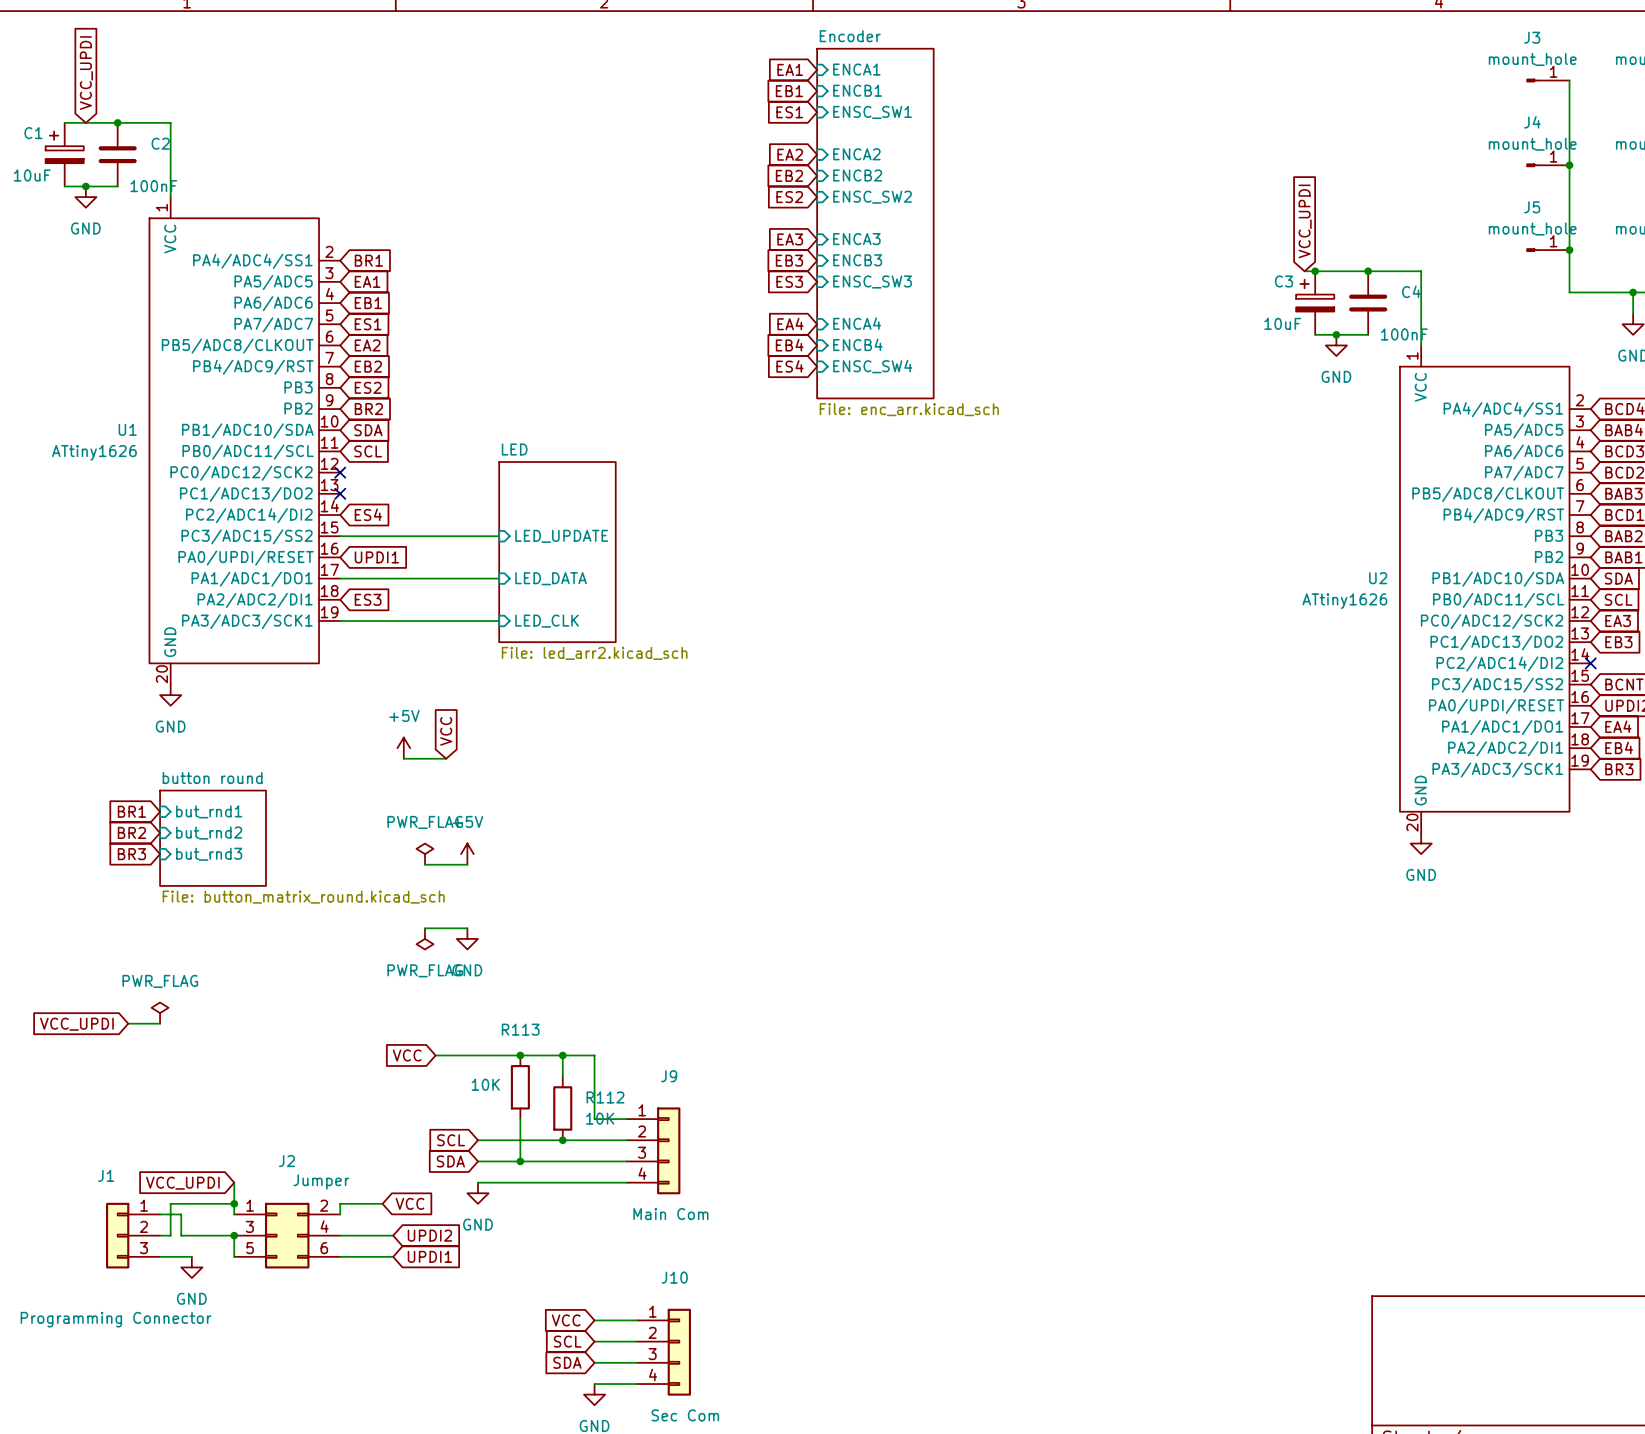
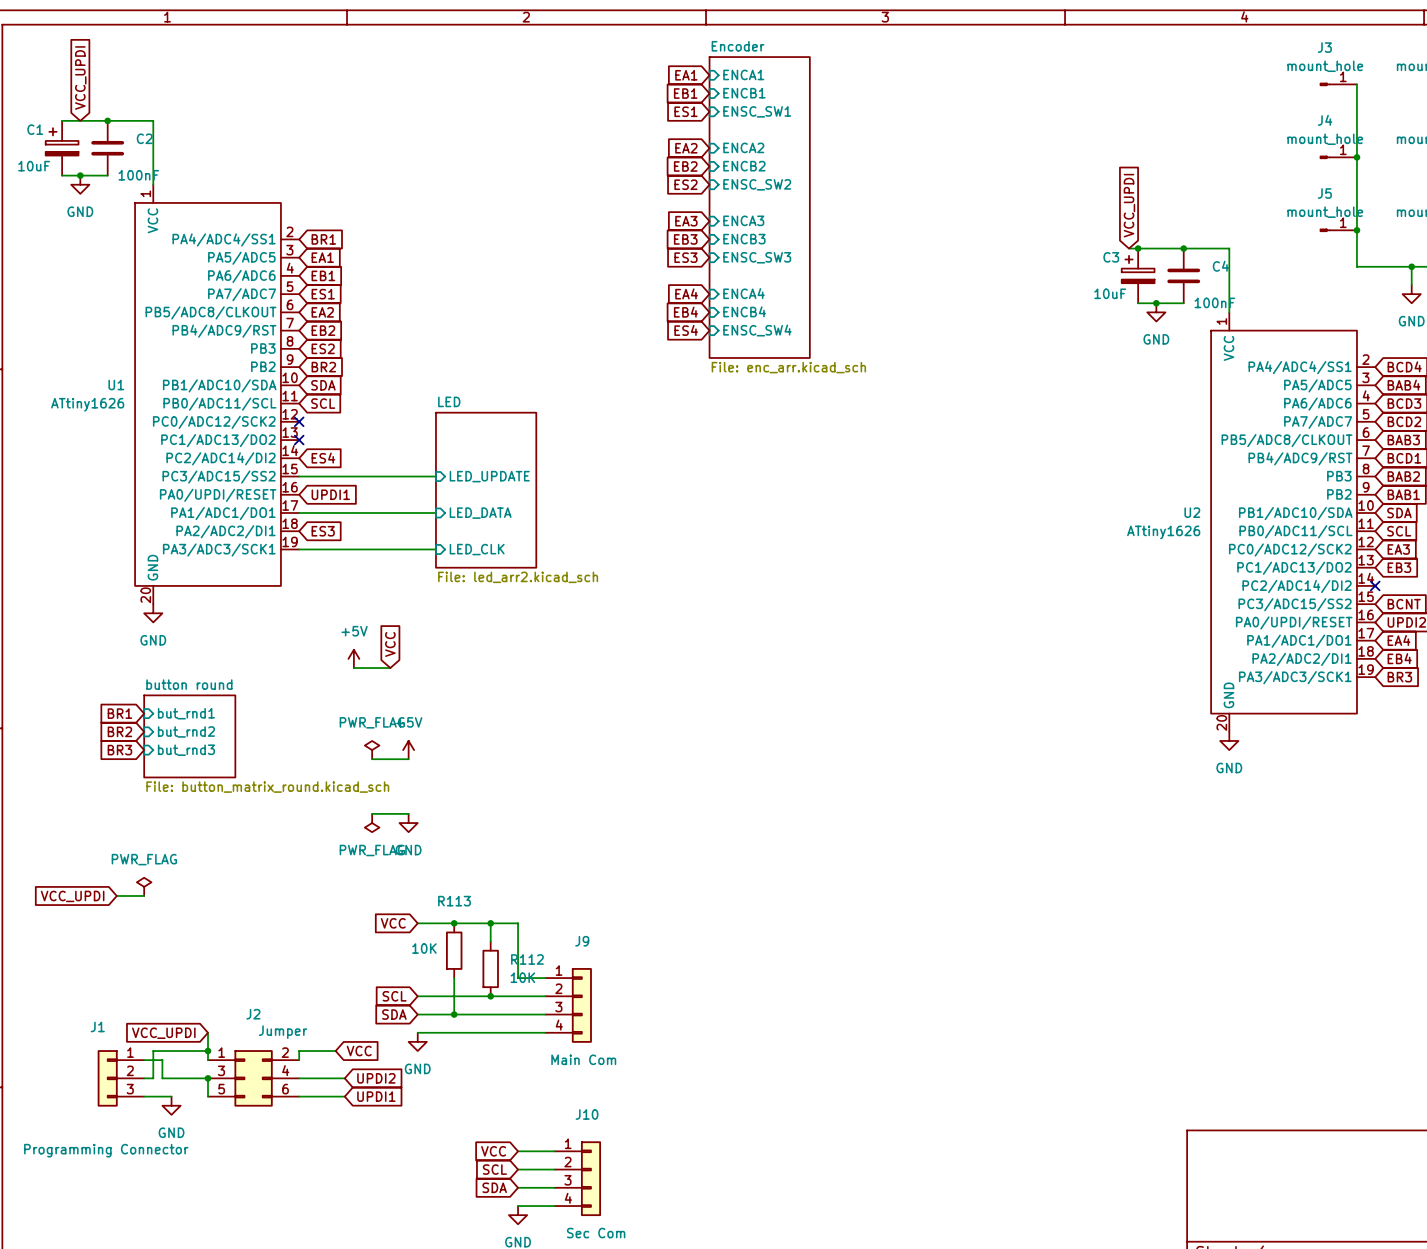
global label position: VCC (407, 1055) -> VCC (393, 923)
wire: (435, 1055) (477, 1055) -> none

